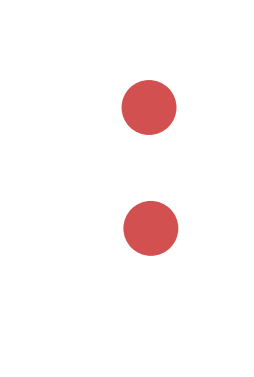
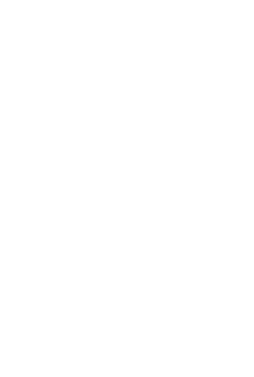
part: (149, 107) -> none
part: (150, 228) -> none

